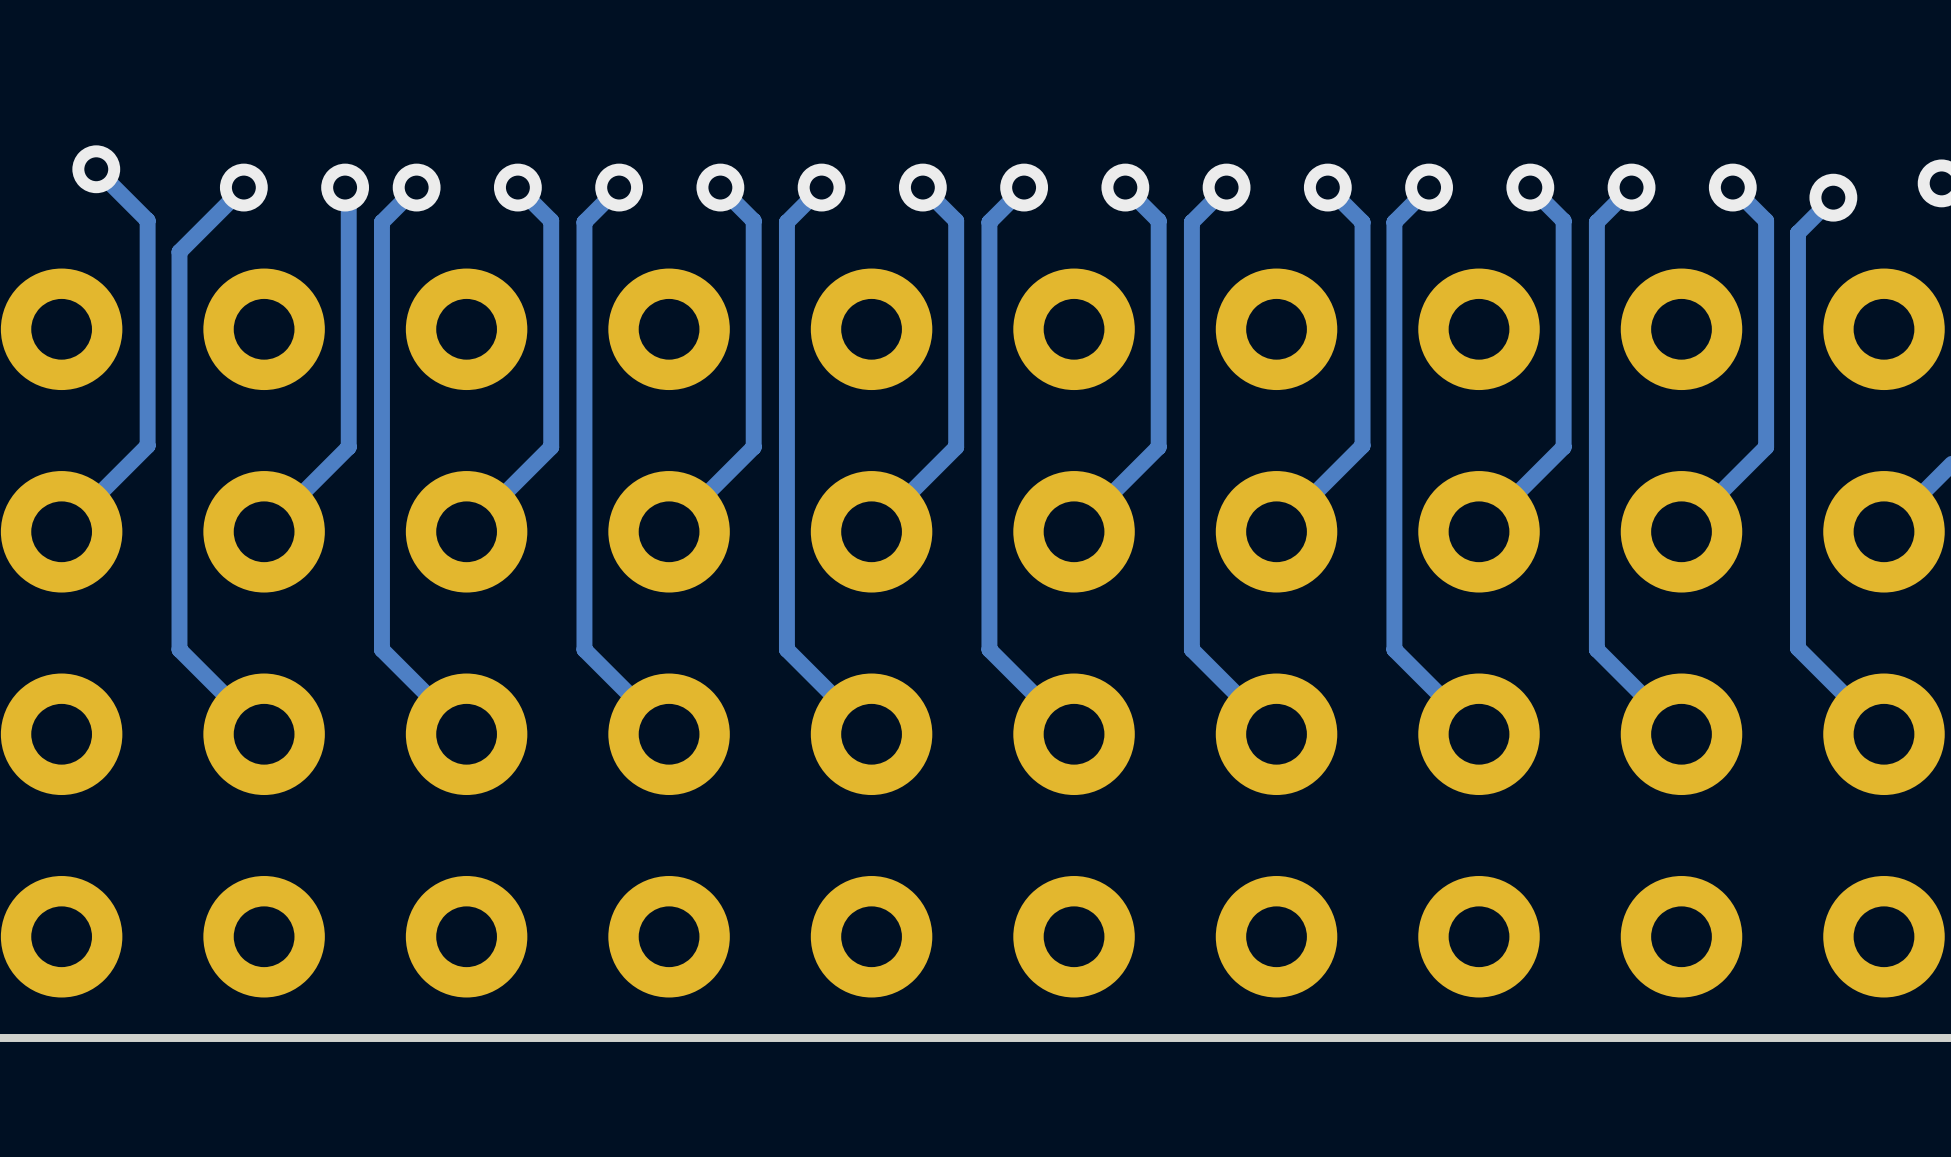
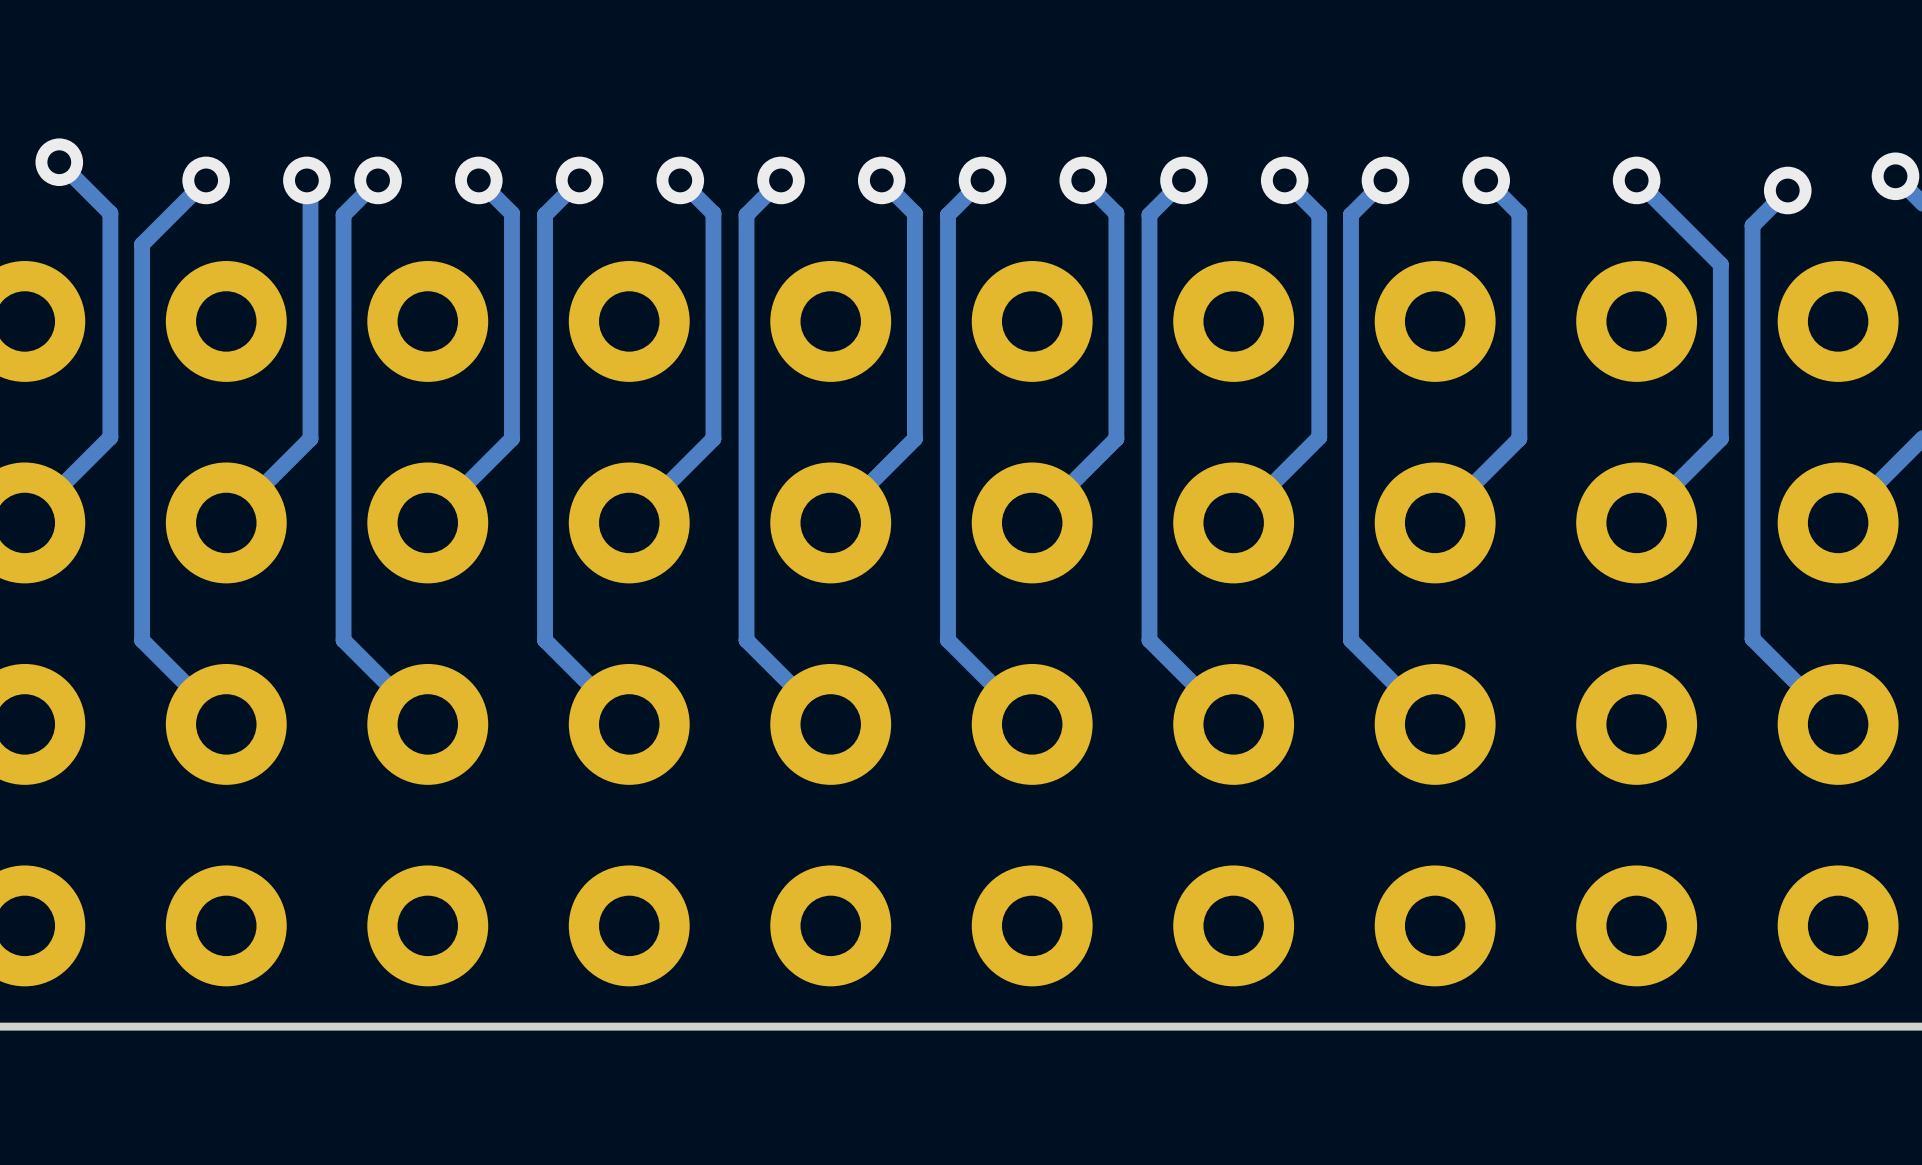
track: (1631, 187) (1596, 222) (1596, 649) (1681, 734) -> none
via: (1631, 187) -> none
via: none -> (1636, 180)
track: (1732, 187) (1766, 220) (1766, 272) -> (1636, 180) (1720, 264)
via: (1732, 187) -> none

